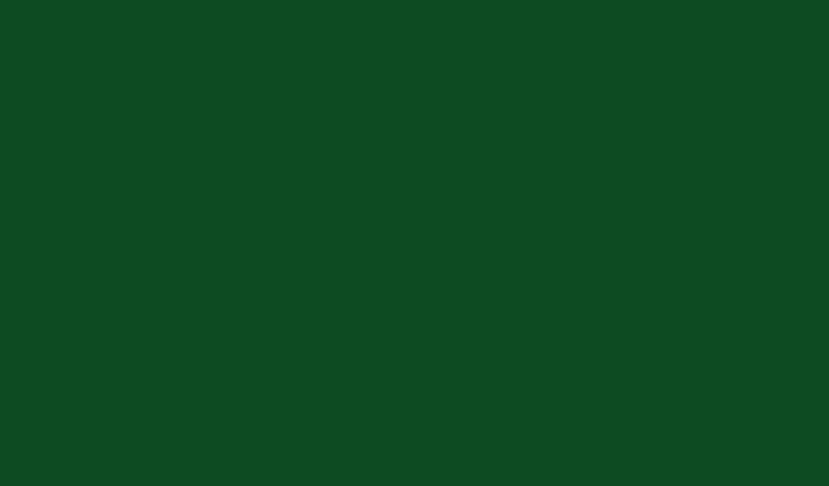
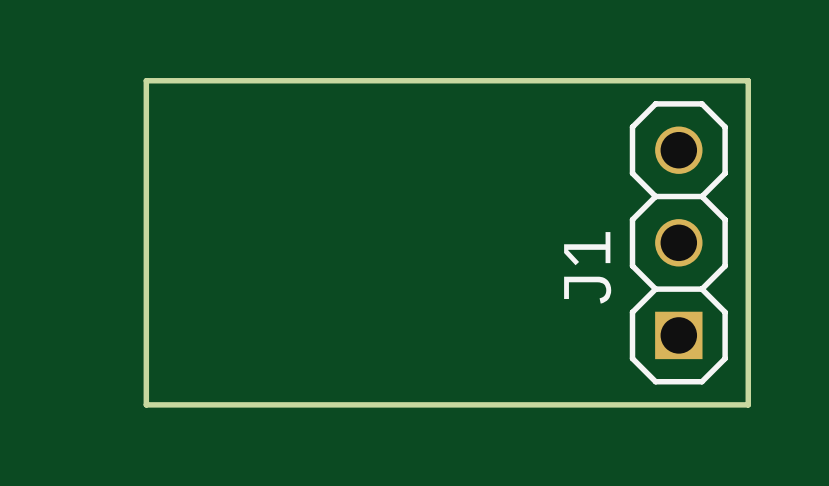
board edge: none -> (146, 80) (146, 404) (748, 404) (748, 80) (146, 80)
J1: none -> (678, 242)

